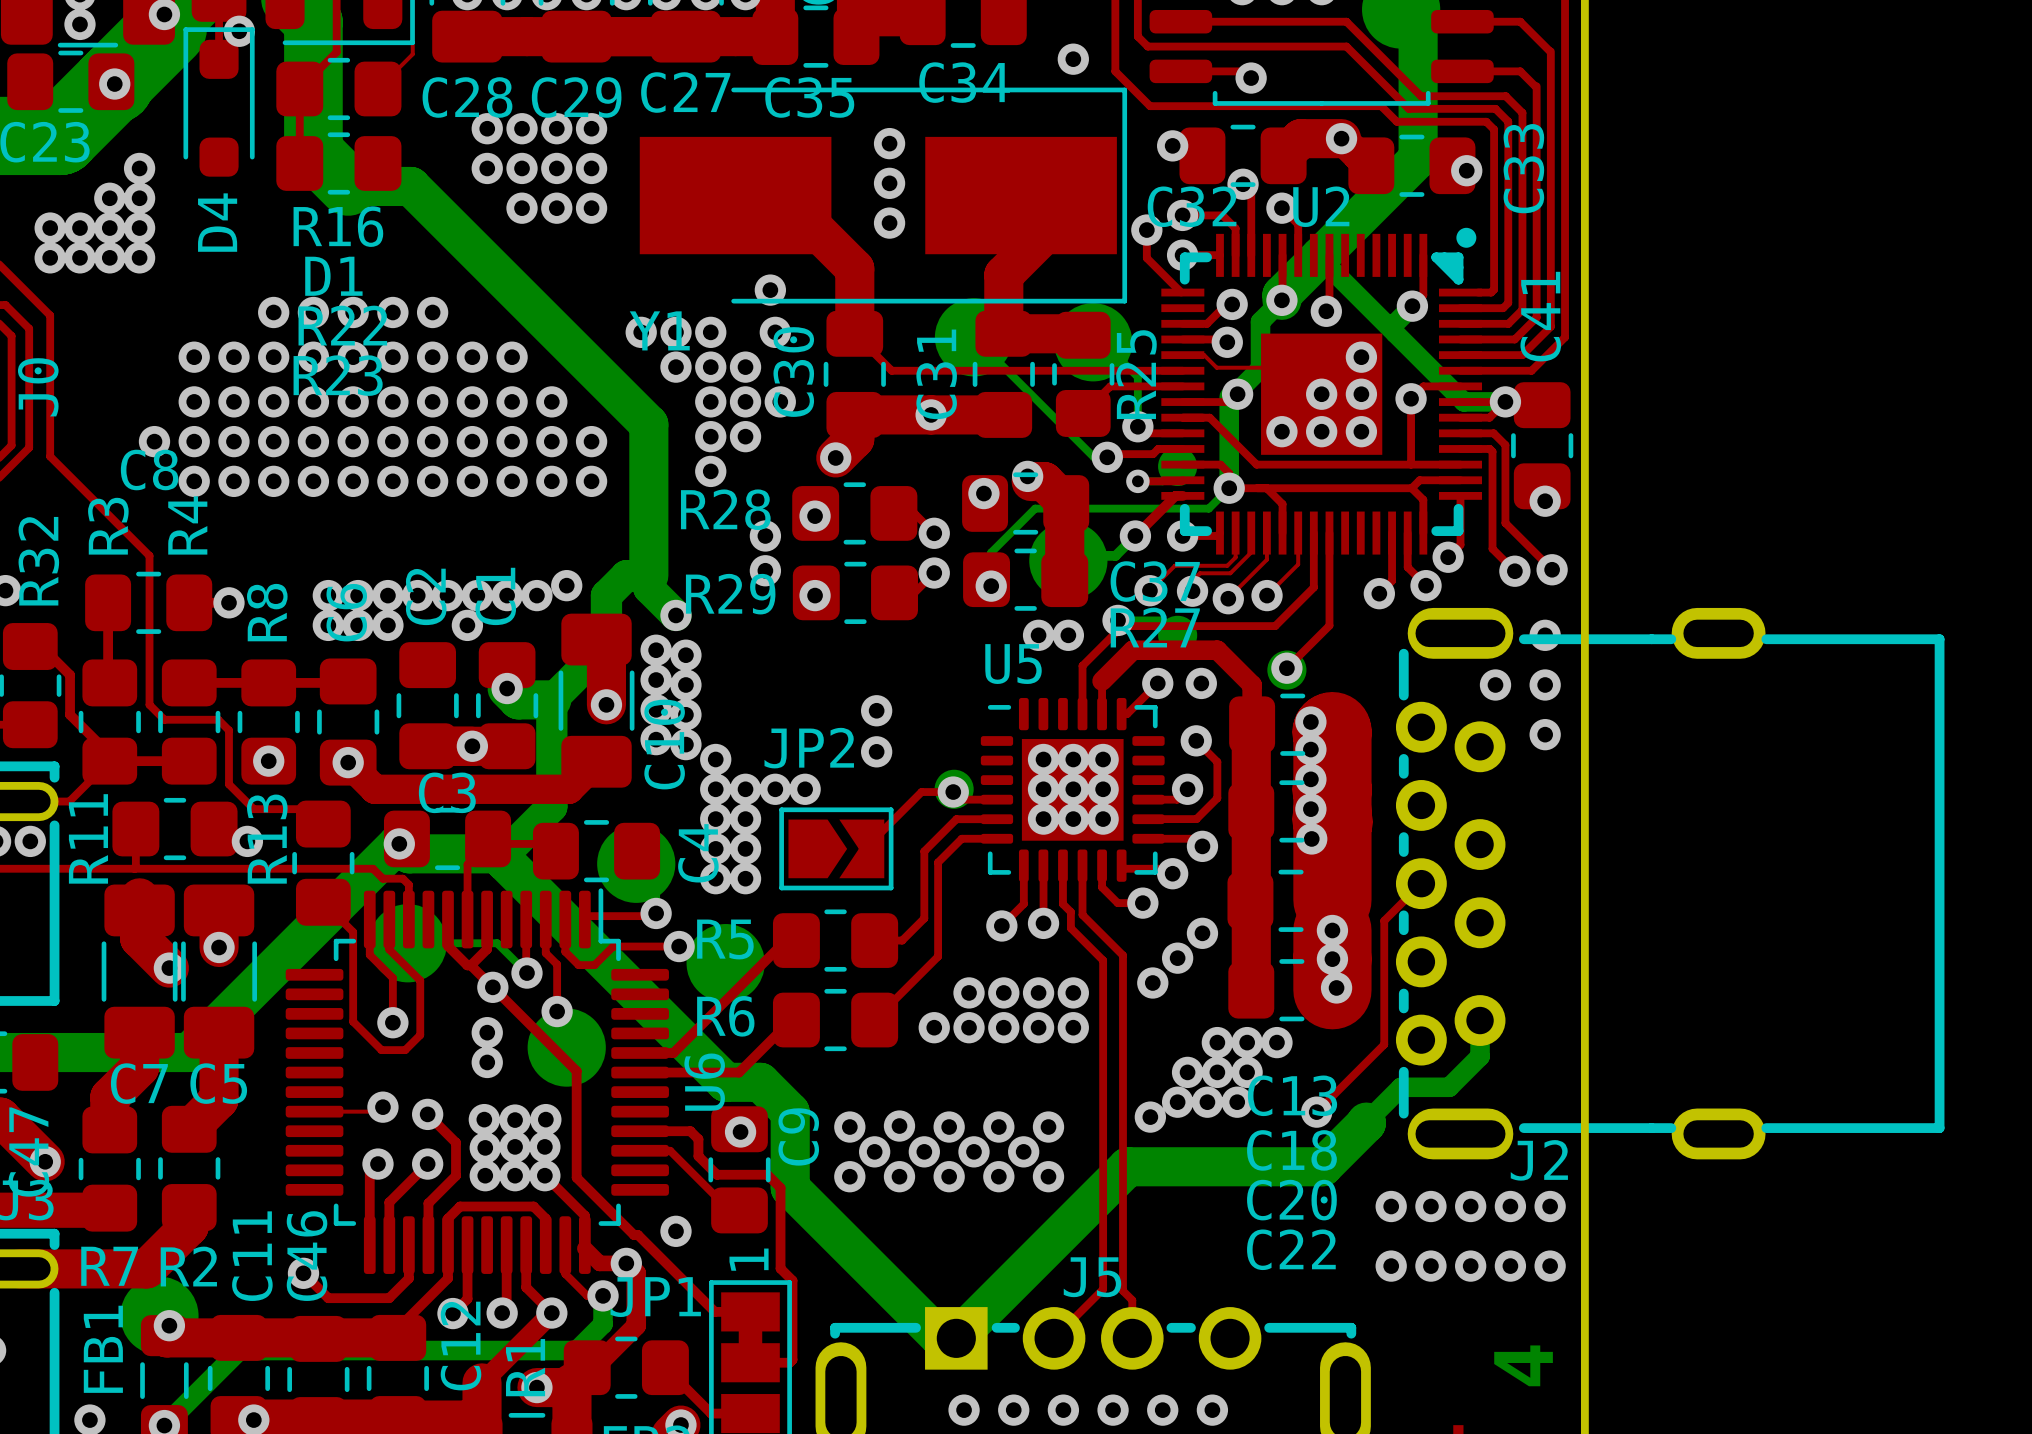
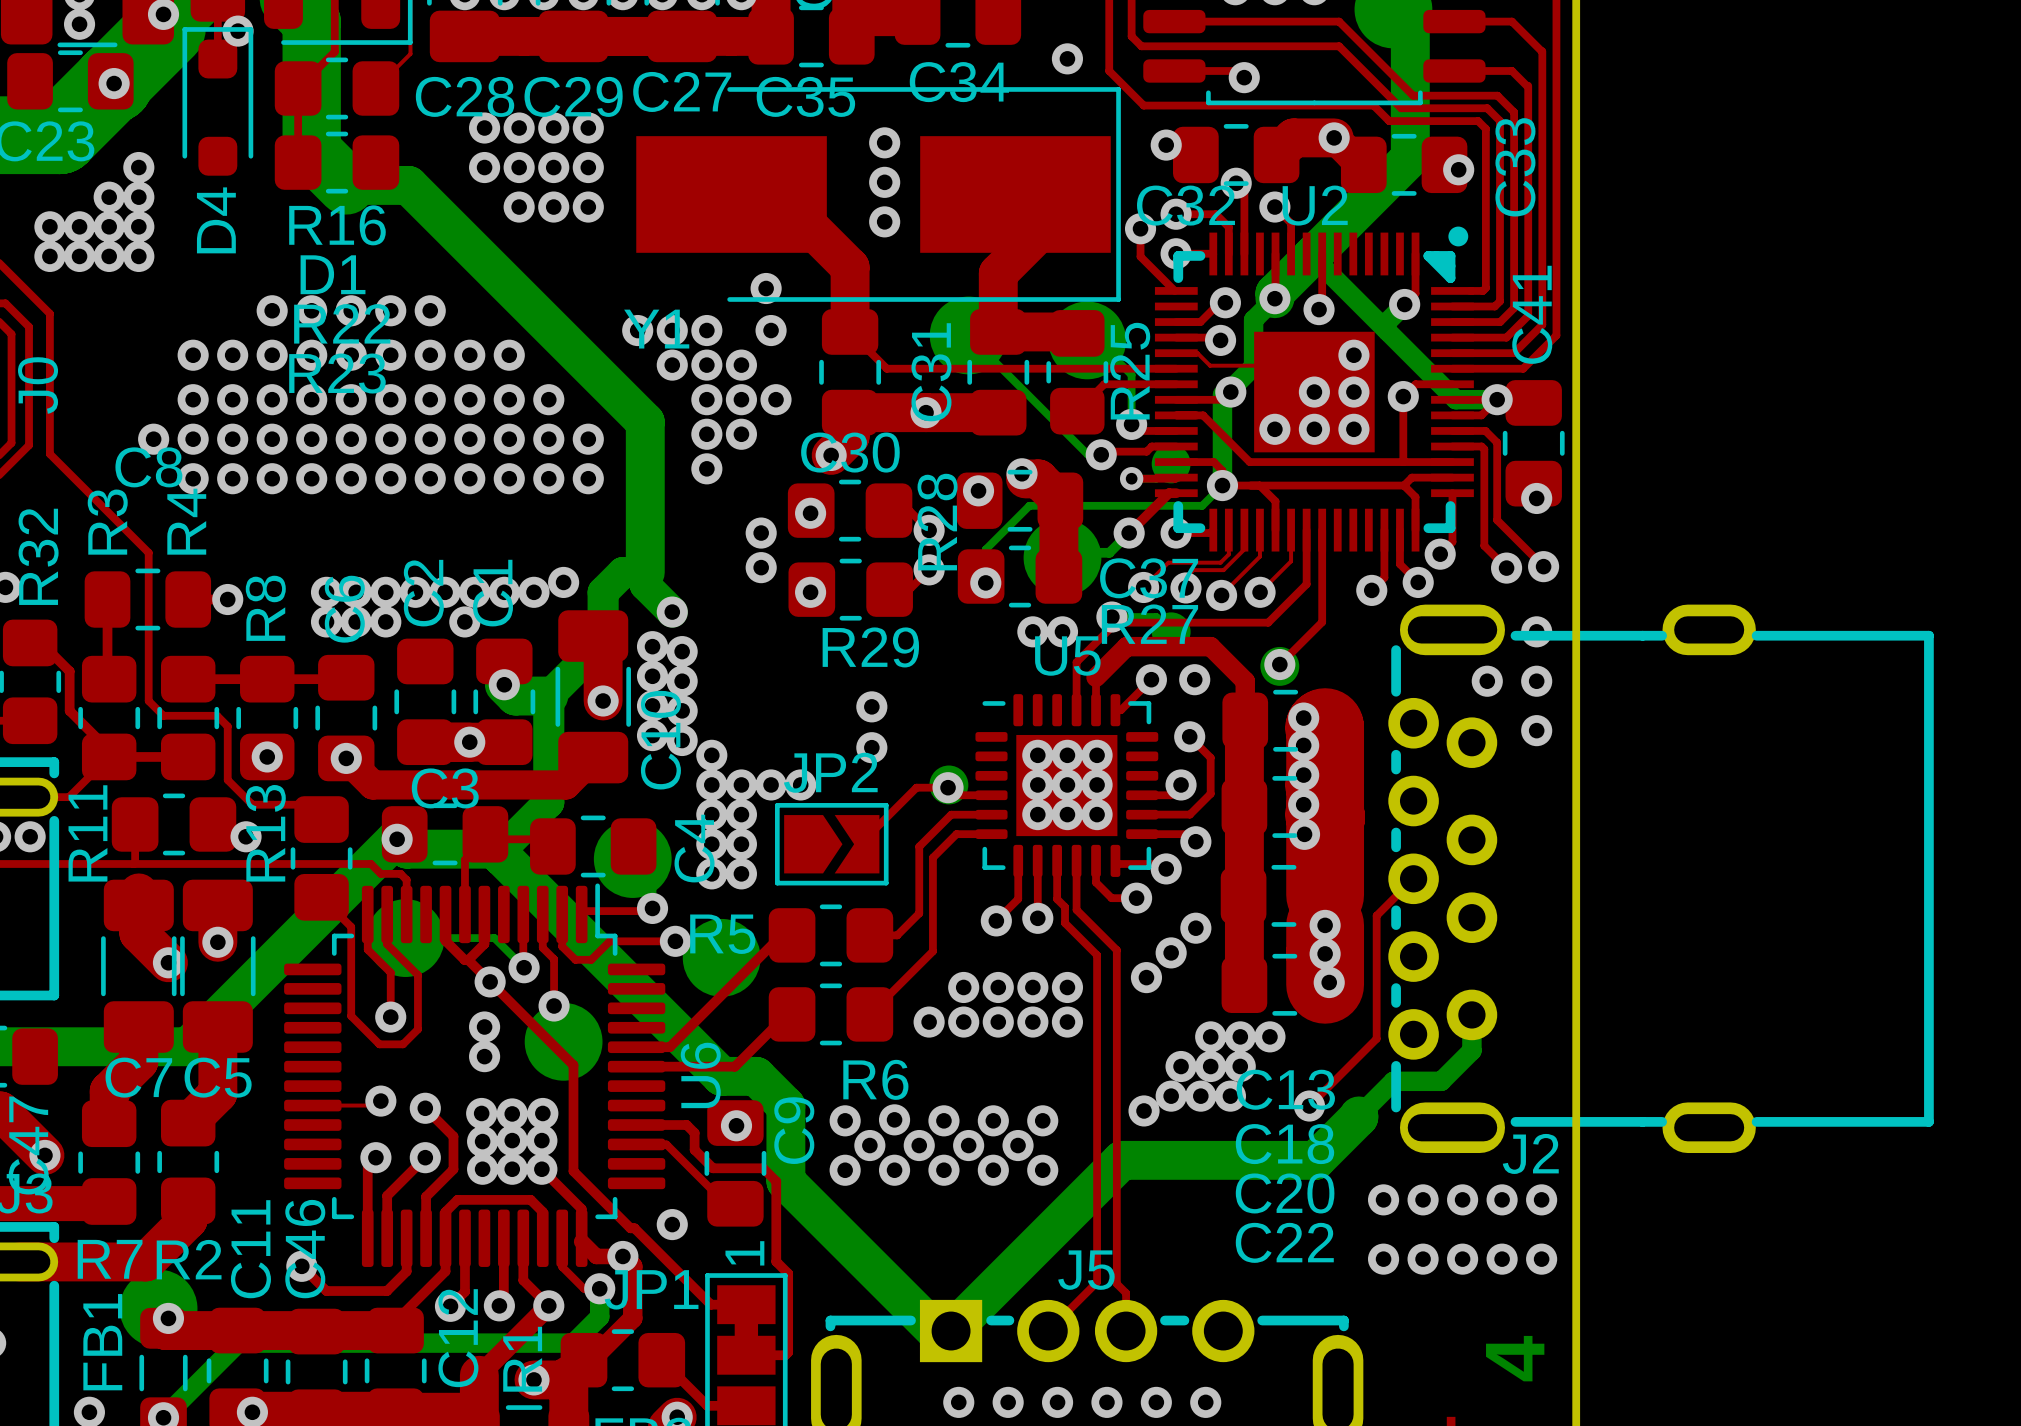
C30 name rotation: 0° (793, 372) -> 90° clockwise (850, 452)
R28 name rotation: 0° (725, 509) -> 90° counterclockwise (937, 522)
R28 name position: R28 (725, 509) -> R28 (937, 522)
R29 name position: R29 (730, 594) -> R29 (870, 647)
U5 name position: U5 (1013, 664) -> U5 (1067, 656)
JP2 name position: JP2 (809, 748) -> JP2 (830, 772)
R6 name position: R6 (725, 1016) -> R6 (875, 1079)

